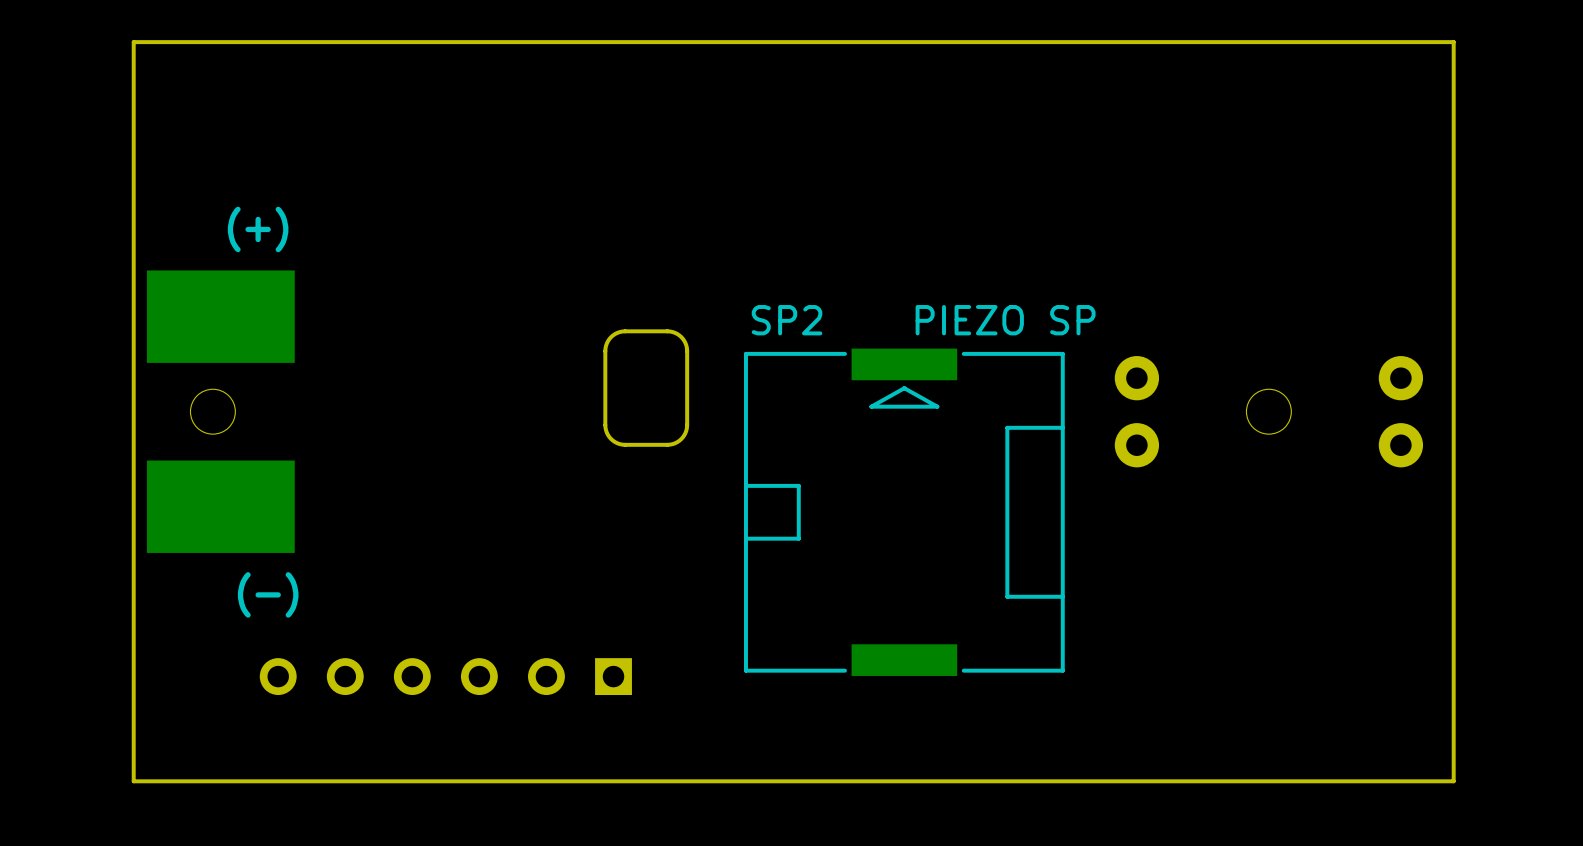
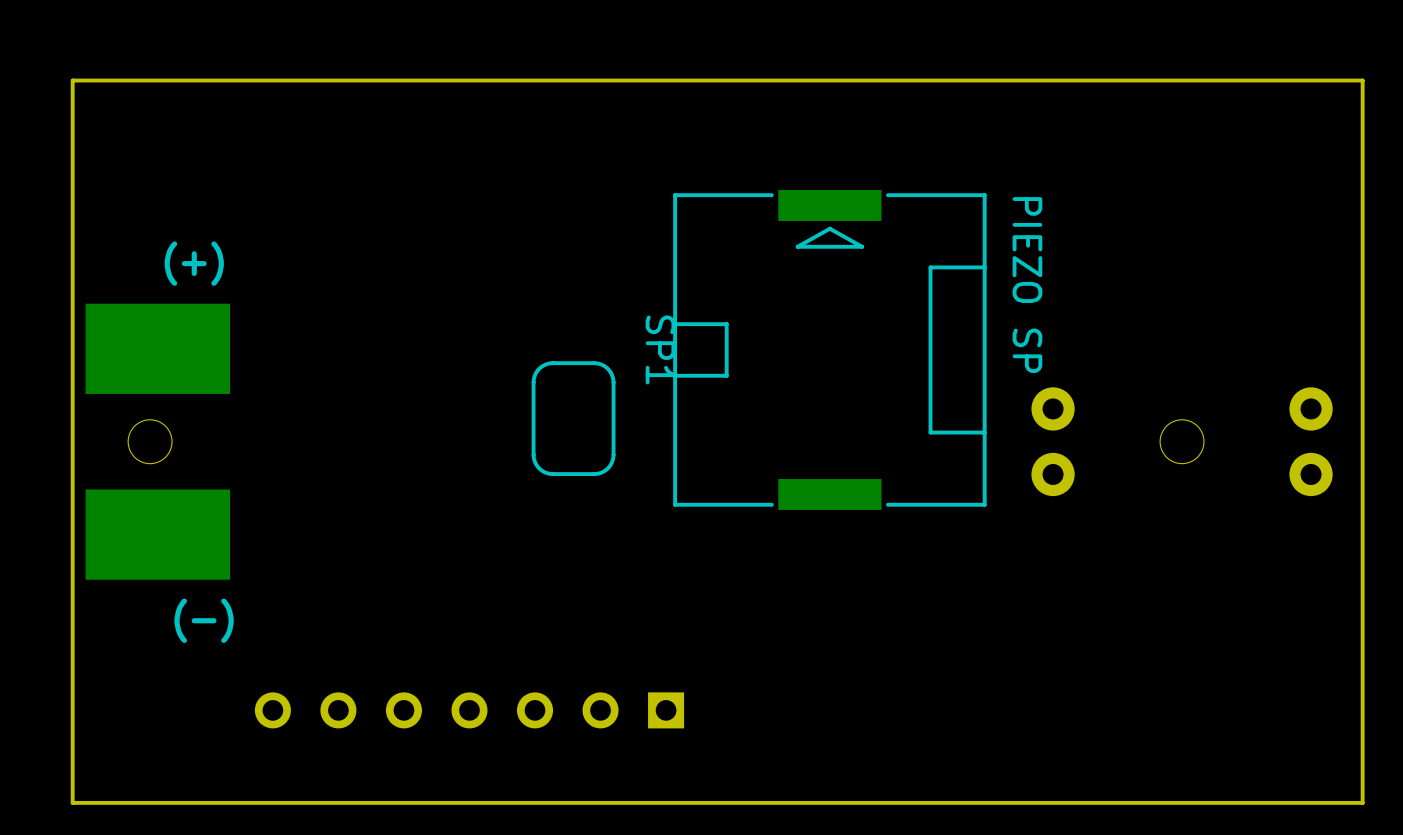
SP1: none -> PIEZO SP (829, 349)
part footprint: [603, 329, 690, 447] -> [531, 361, 616, 477]
SP2: PIEZO SP (904, 512) -> none
part: (445, 676) -> none
part: none -> (469, 710)

